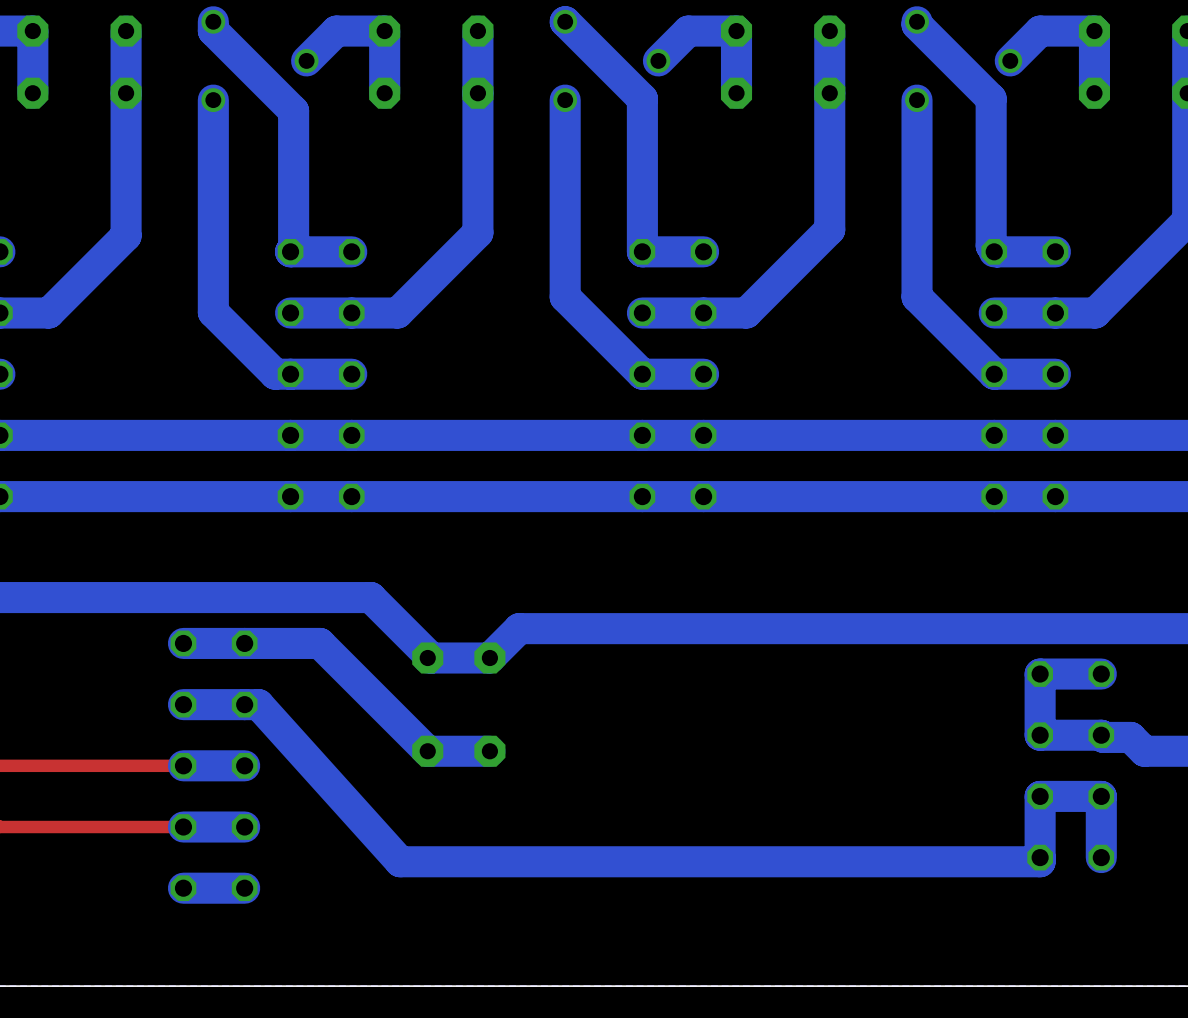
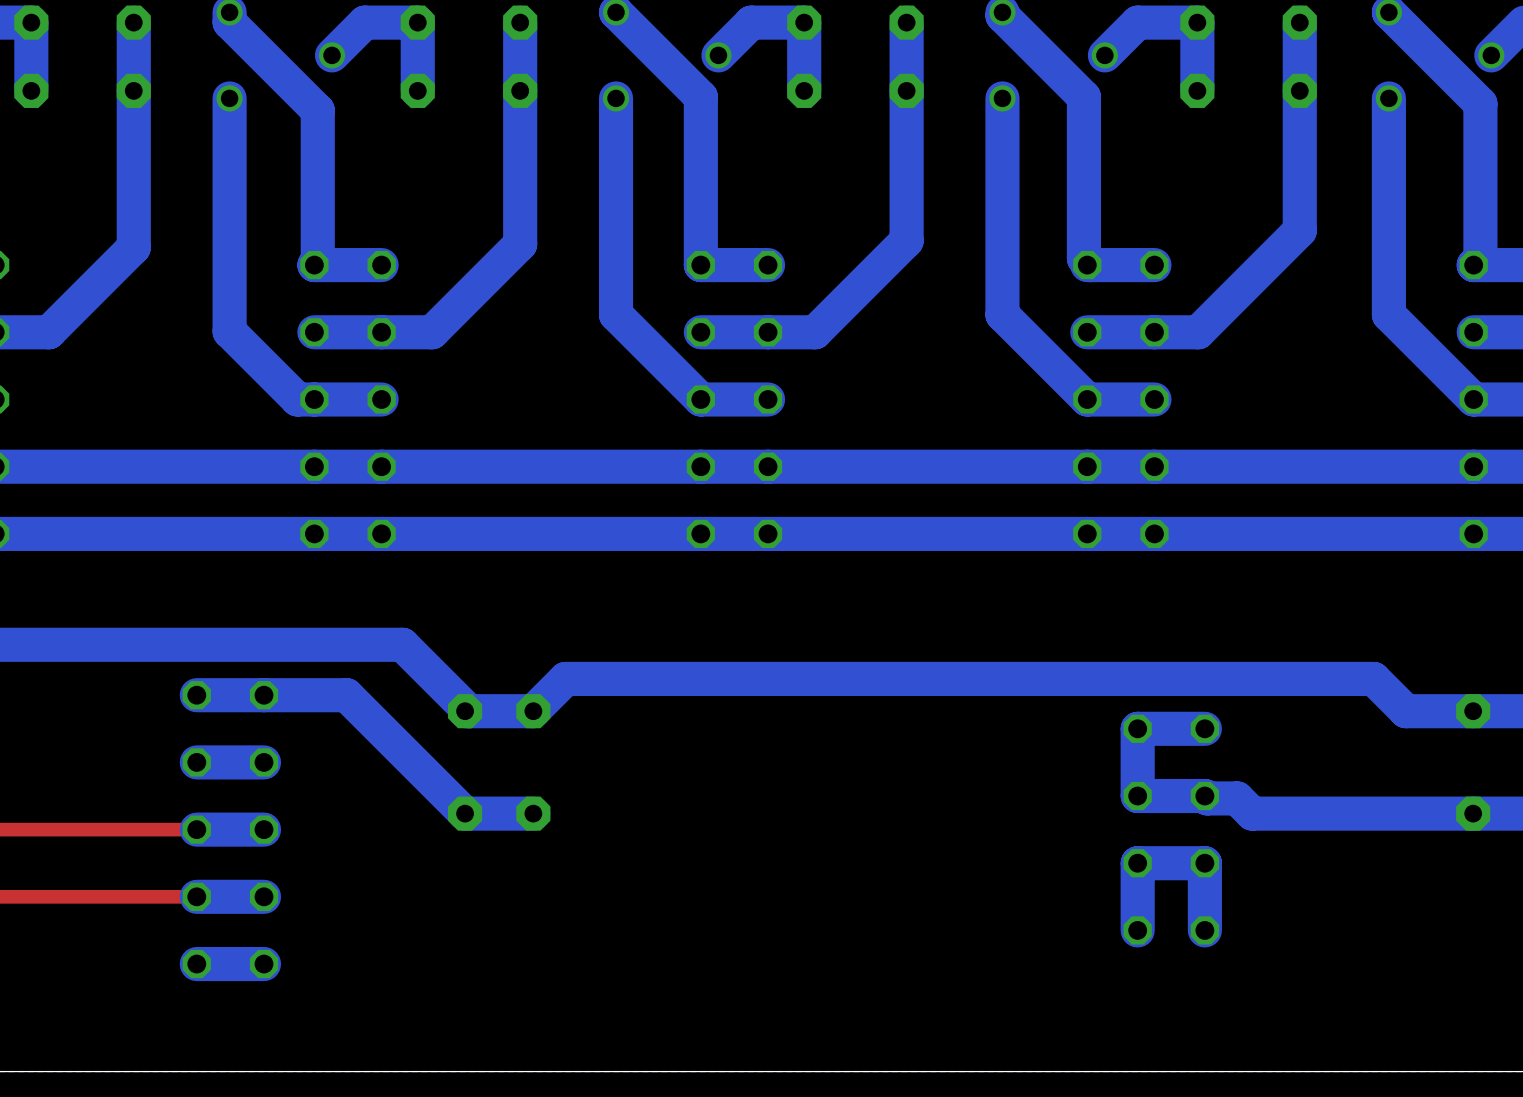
bottom track: (244, 704) (258, 704) (400, 861) (1040, 861) (1040, 857) -> none

